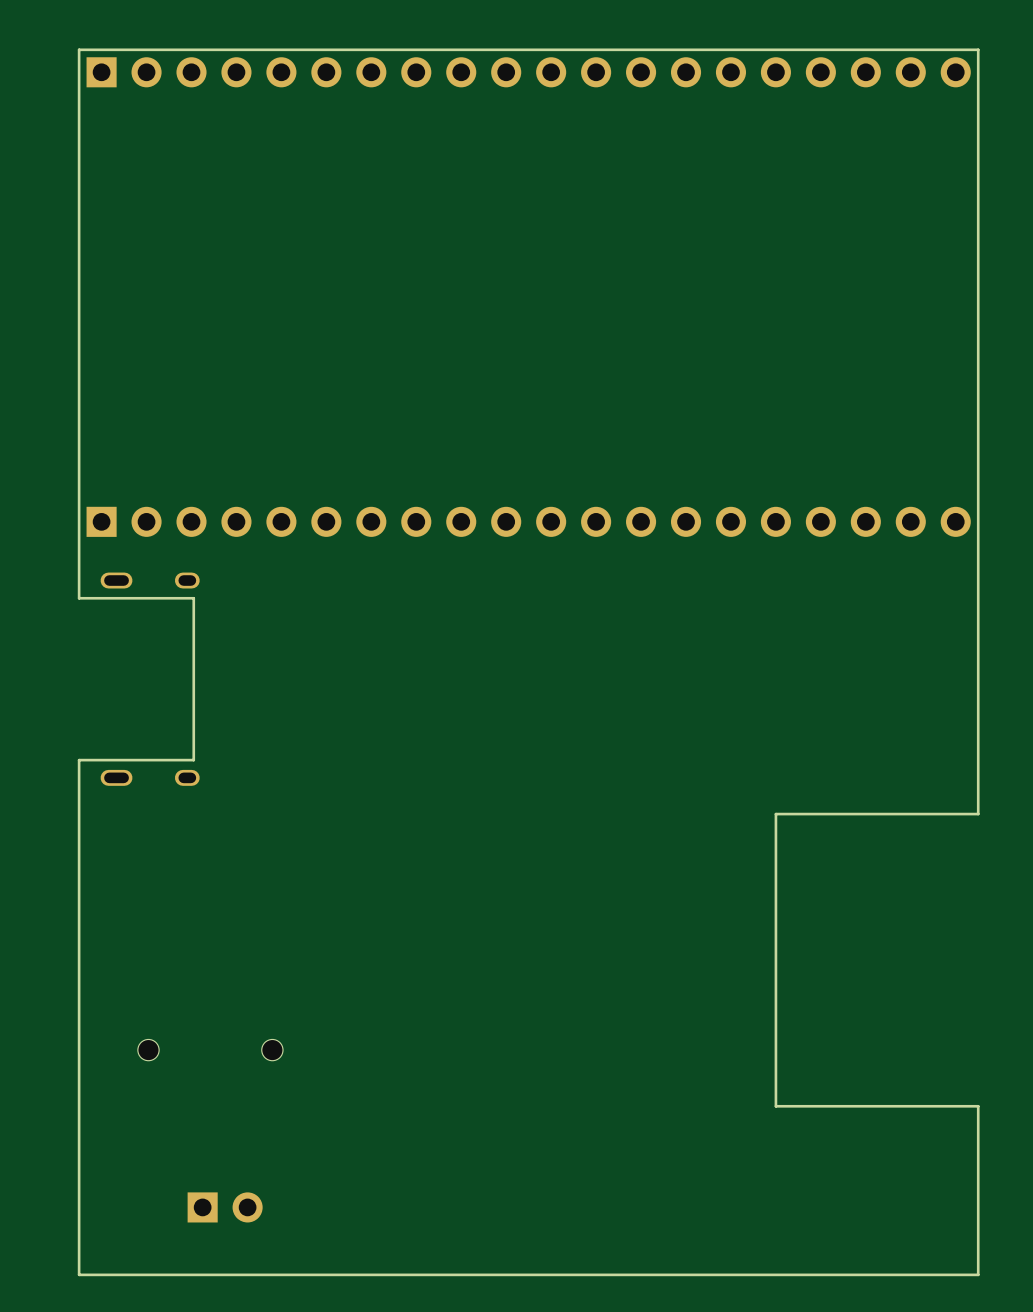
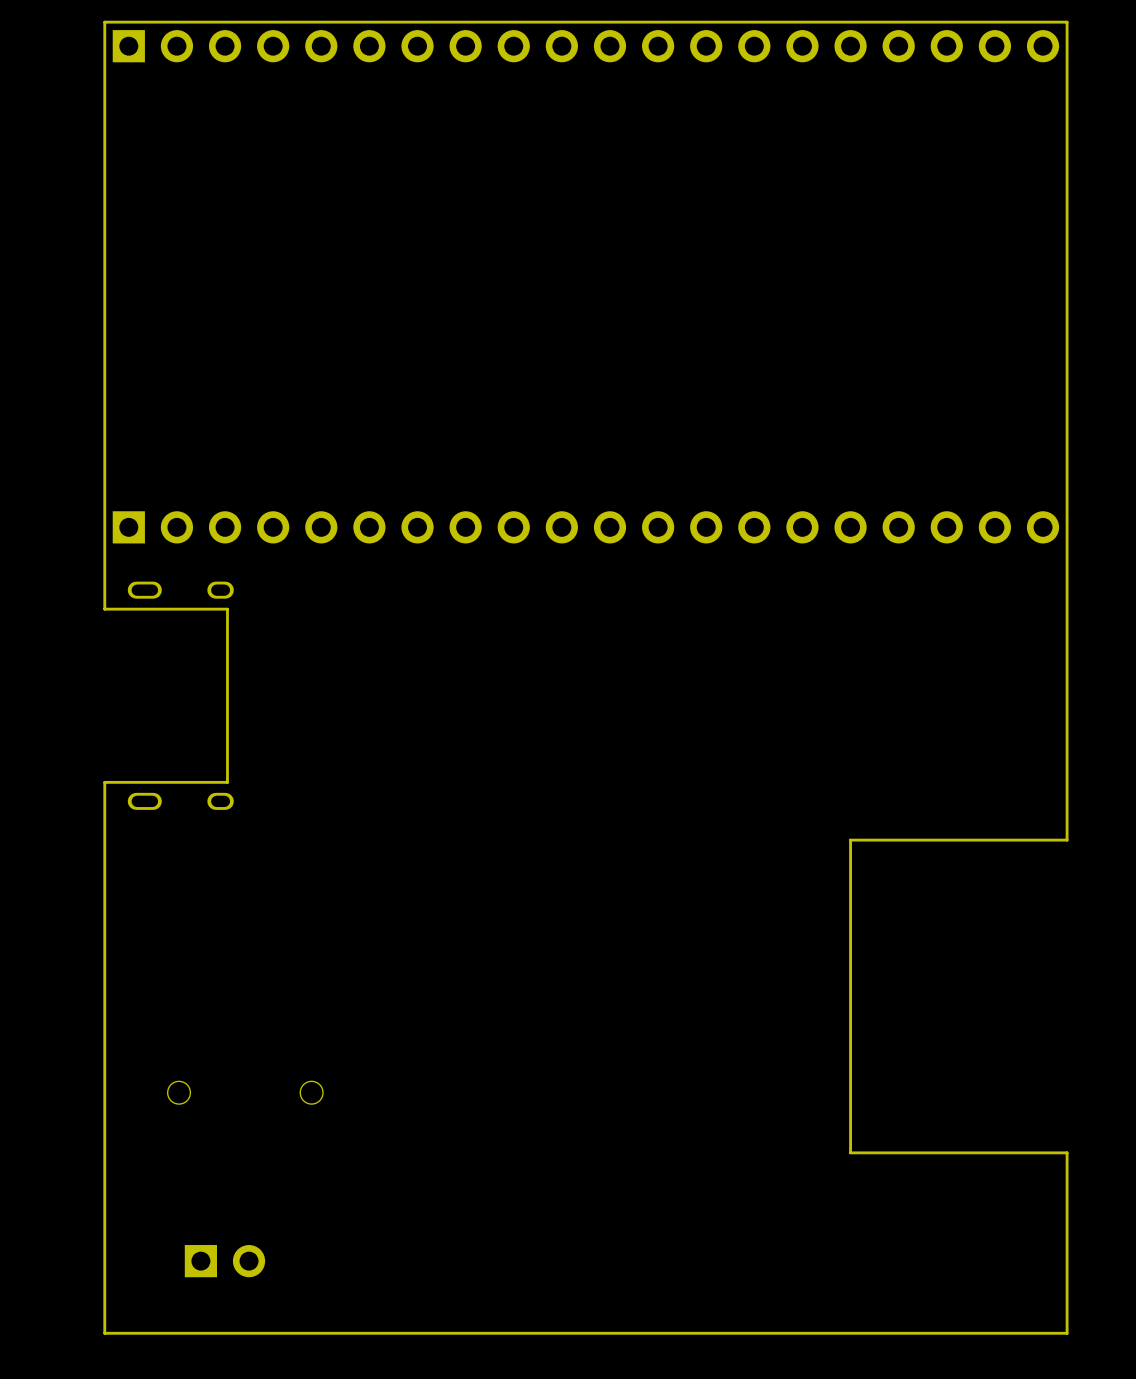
part position: (225, 1207) -> (224, 1261)

